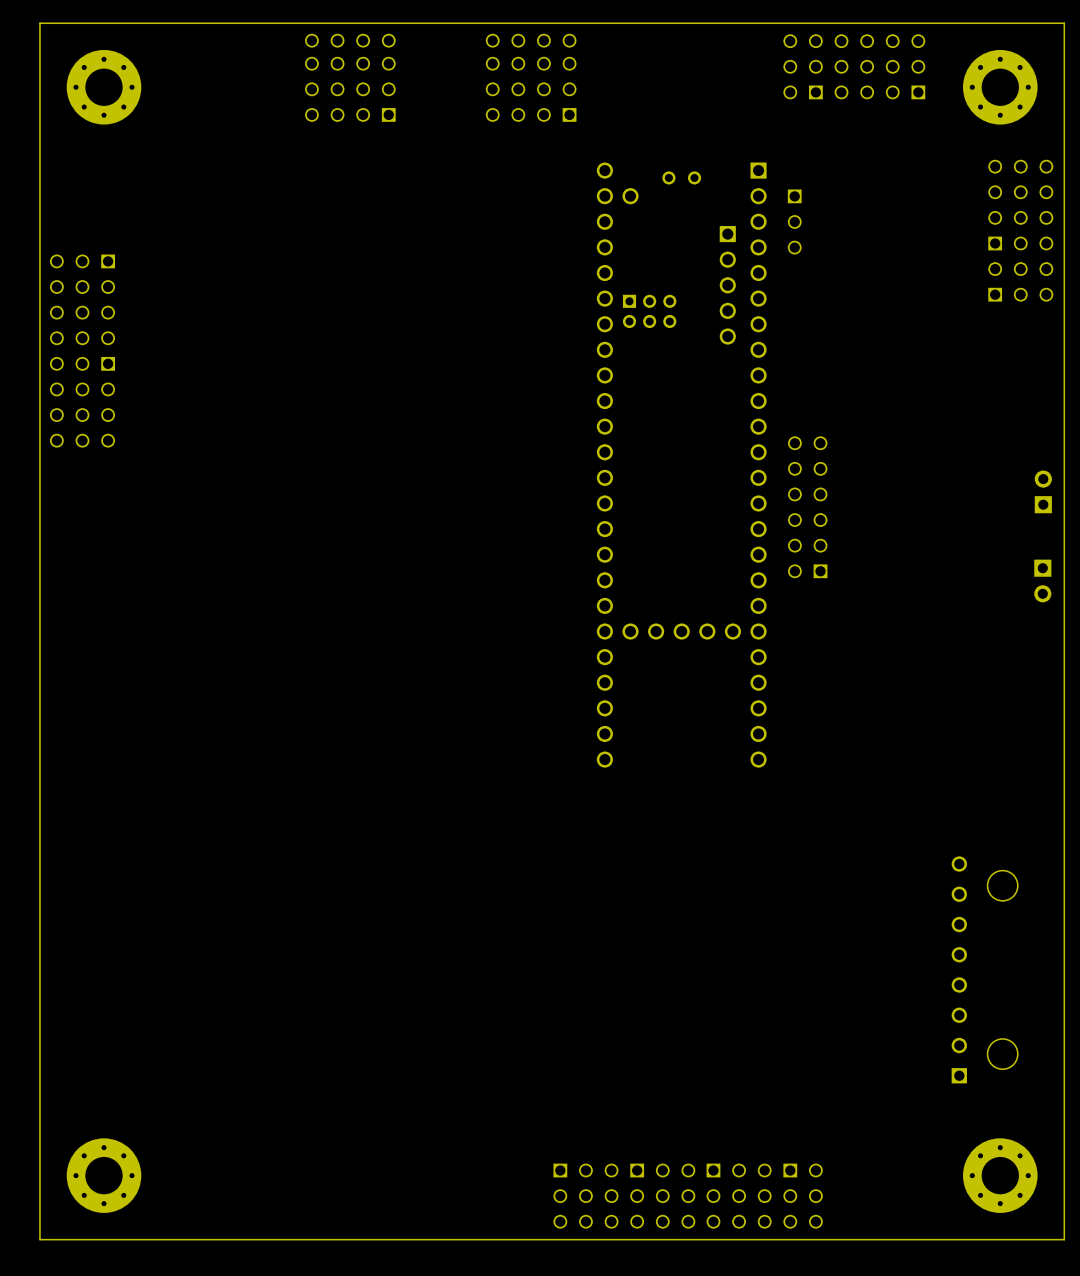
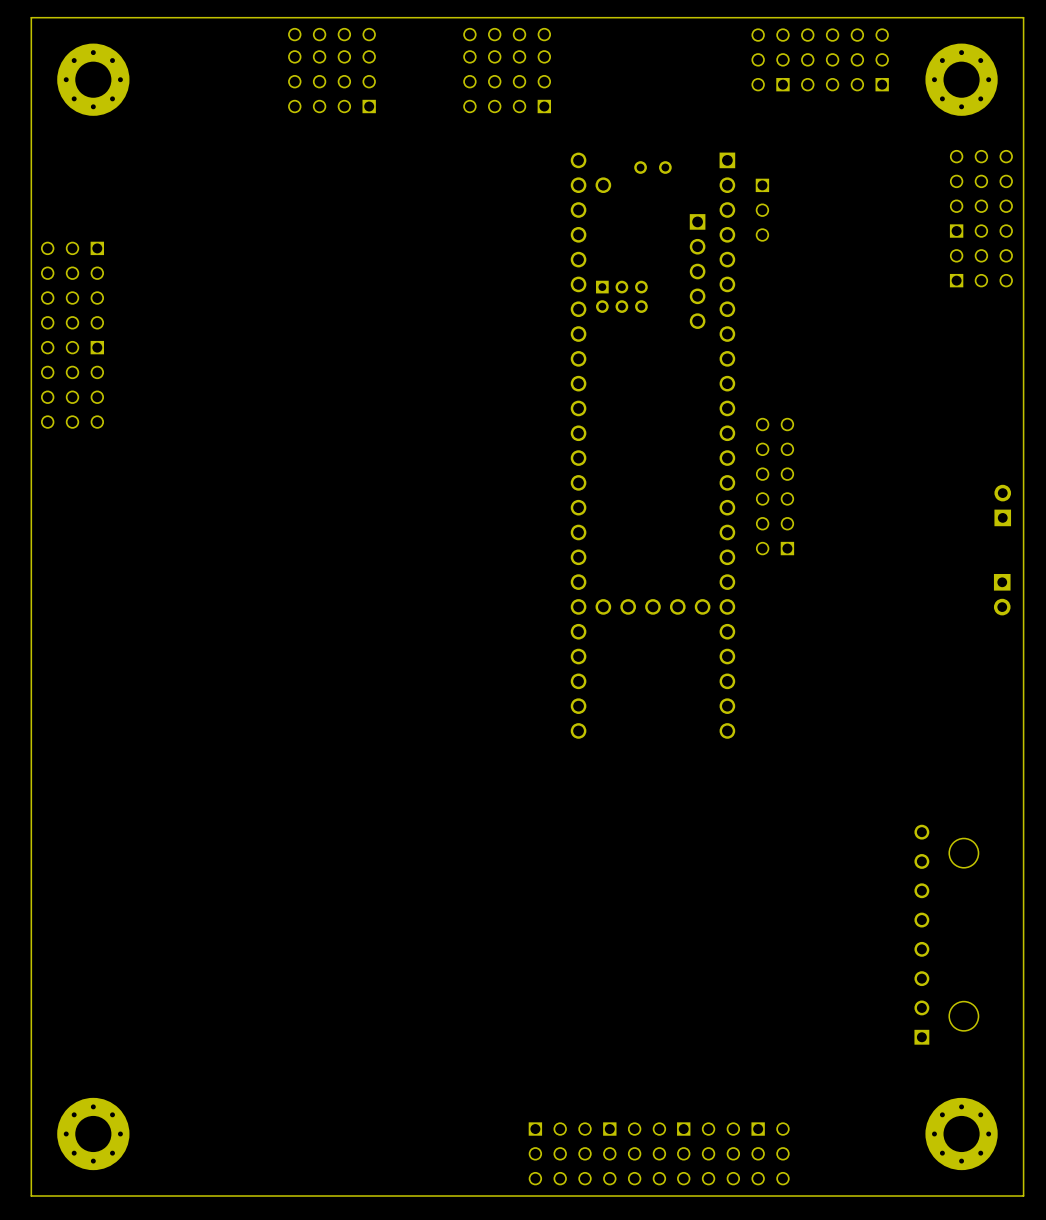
part: (1043, 491) -> none
part: none -> (1002, 505)
part: (1042, 581) -> none
part: none -> (1002, 594)

